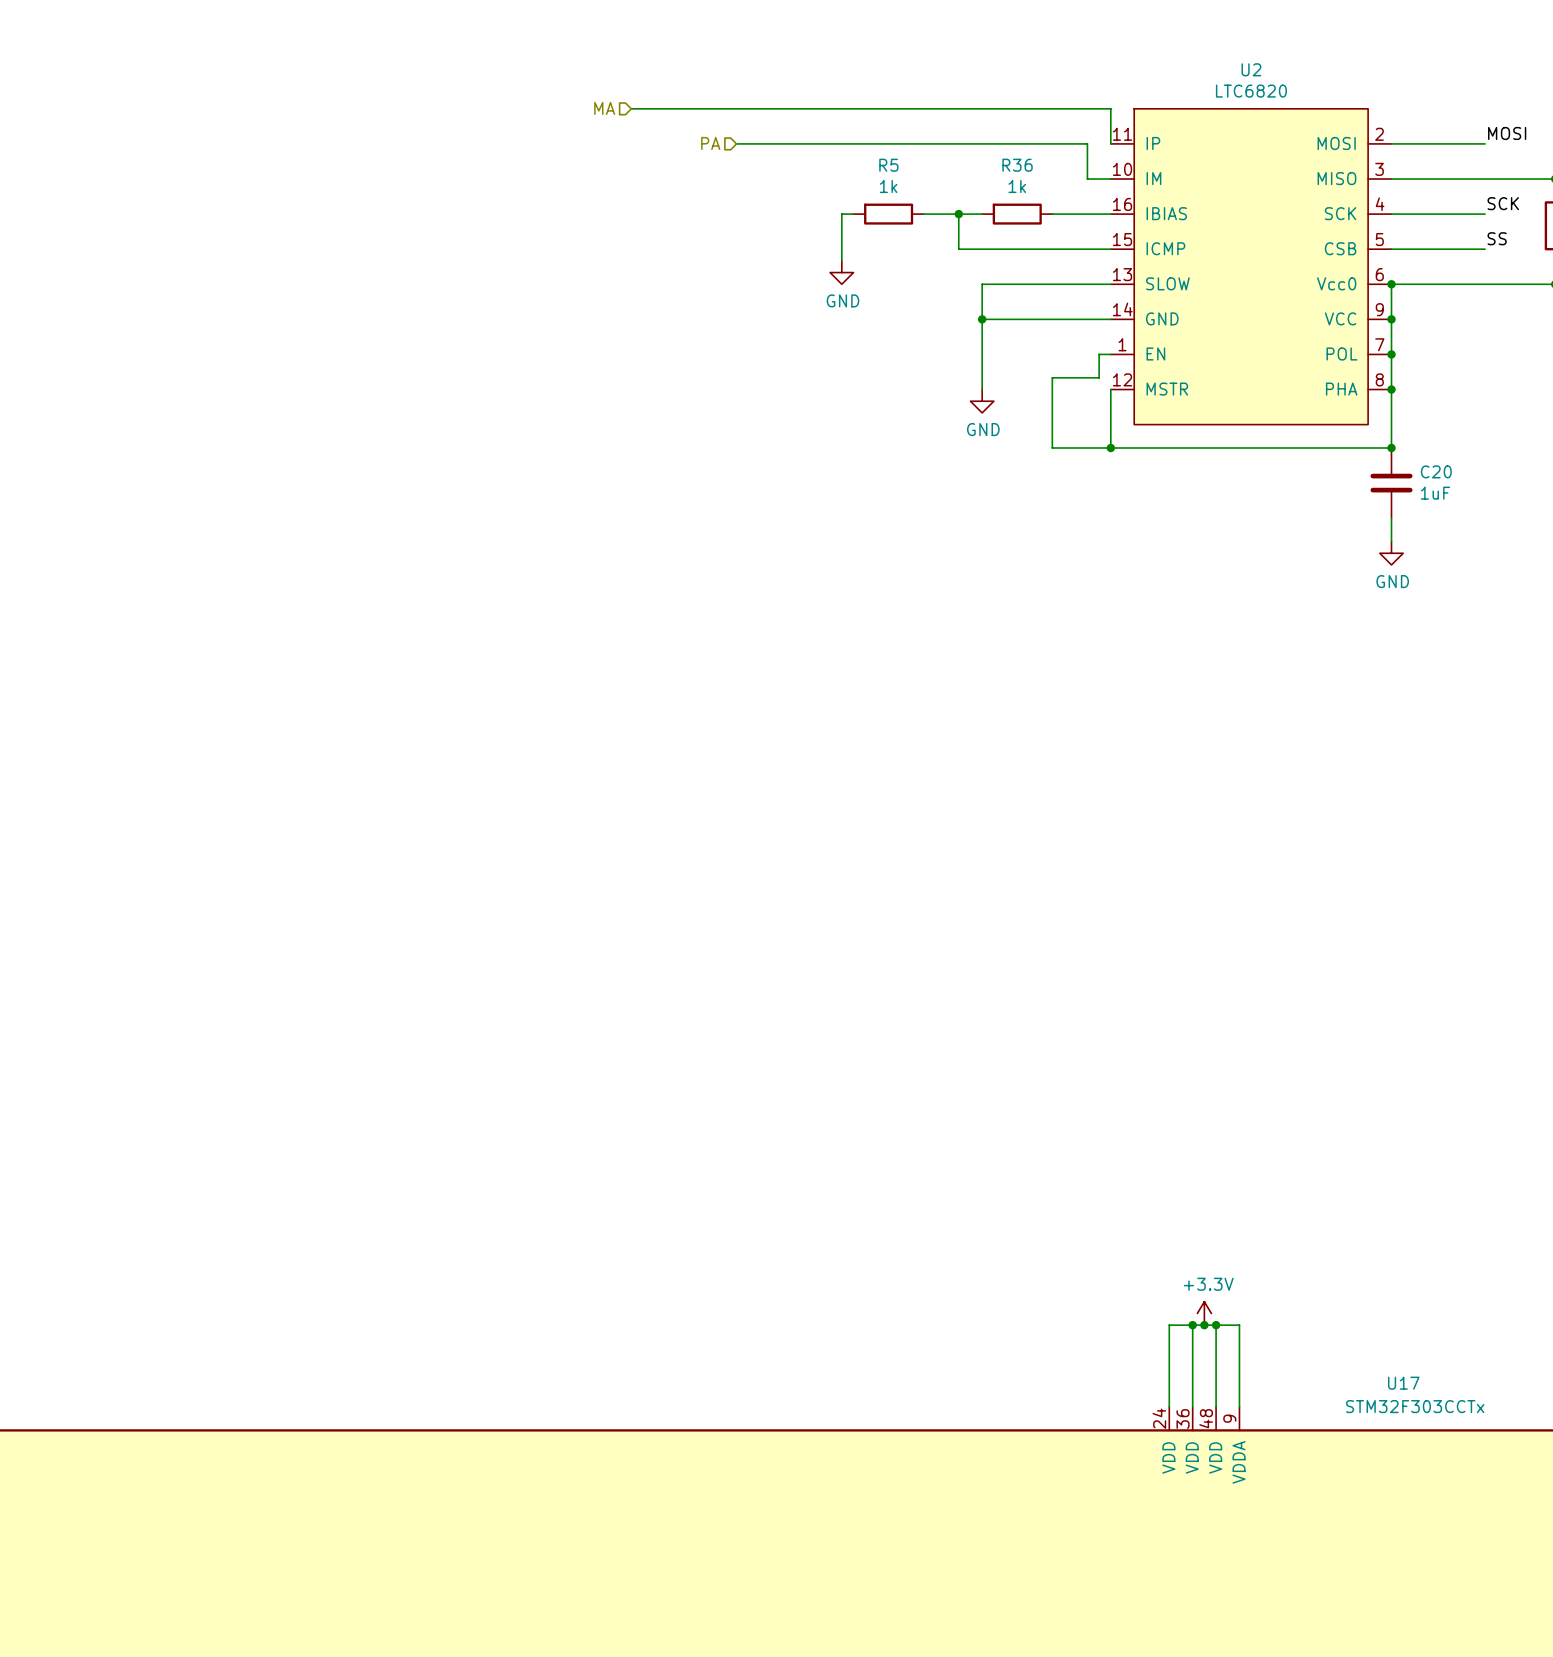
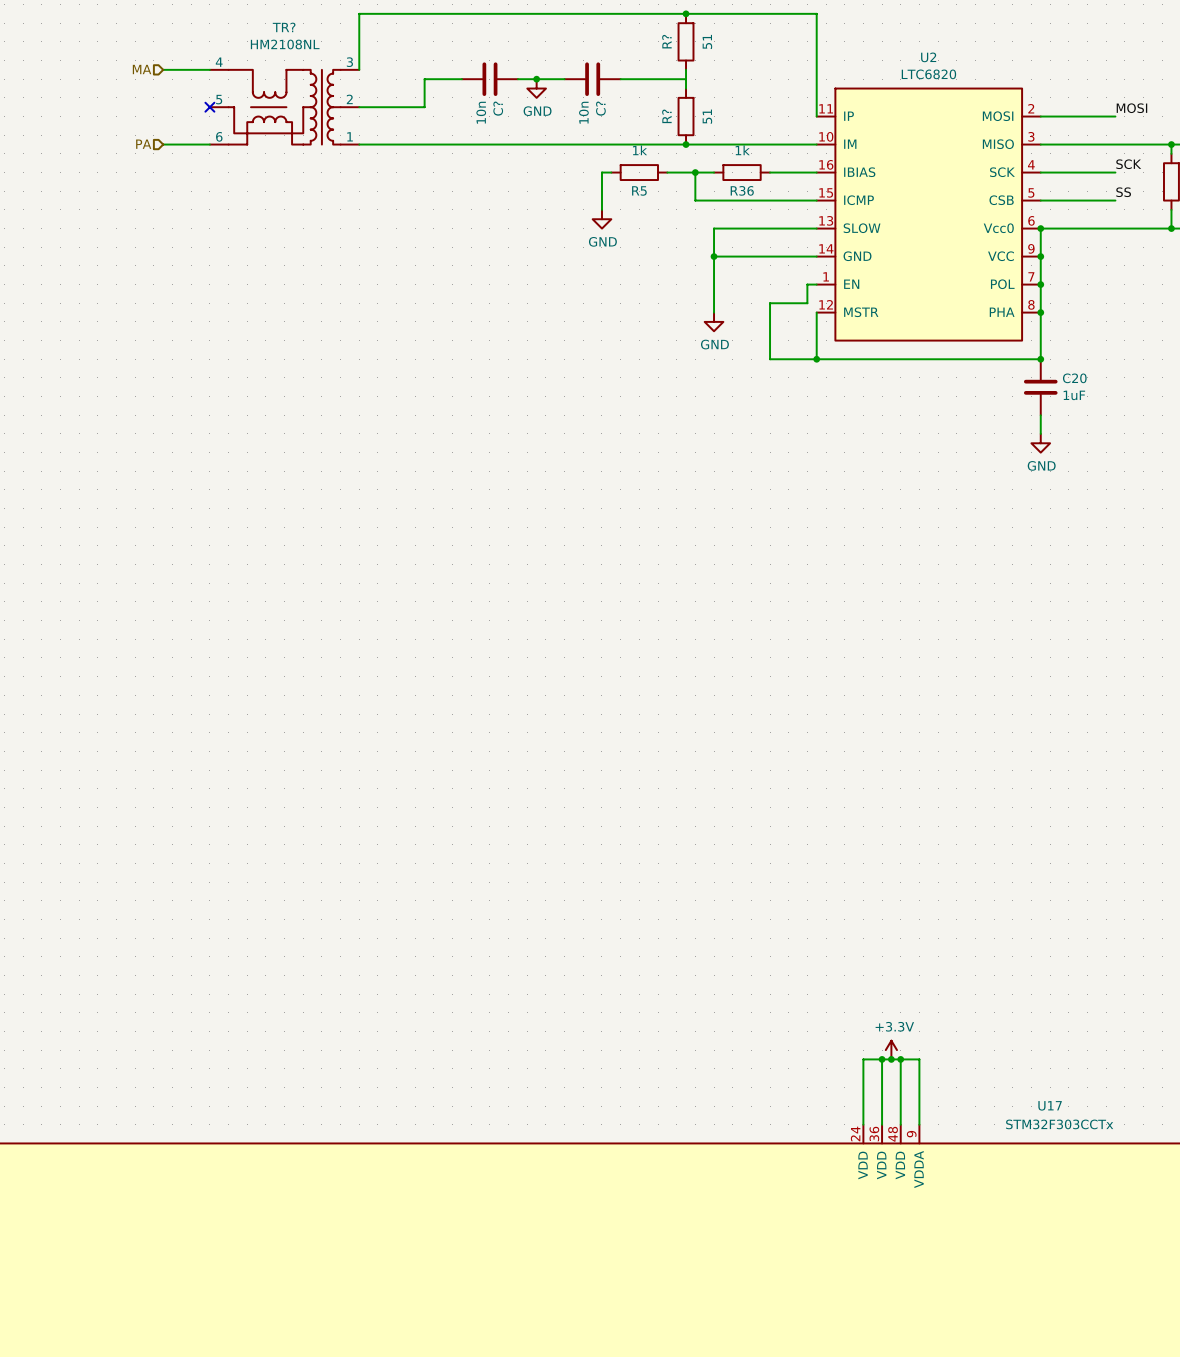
junction: none -> (686, 13)
R?: none -> 51 (686, 41)
hierarchical label: none -> MA (142, 69)
wire: none -> (163, 69) (209, 69)
wire: none -> (686, 69) (686, 88)
wire: none -> (461, 79) (424, 79) (424, 107) (359, 107)
C?: none -> 10n (489, 79)
wire: none -> (517, 79) (564, 79)
junction: none -> (536, 79)
C?: none -> 10n (592, 79)
wire: none -> (620, 79) (686, 79)
hierarchical label: MA (604, 108) -> none
wire: (631, 108) (1110, 108) -> (359, 69) (359, 13) (816, 13) (816, 88)
power symbol: none -> GND (536, 88)
no-connect mark: none -> (209, 107)
TR?: none -> HM2108NL (284, 107)
hierarchical label: PA (710, 143) -> none
wire: (736, 143) (1087, 143) (1087, 179) -> (359, 144) (798, 144)
R?: none -> 51 (686, 116)
R5 name position: R5 (888, 165) -> R5 (639, 190)
R36 name position: R36 (1017, 165) -> R36 (742, 190)
hierarchical label: none -> PA (143, 144)
wire: none -> (163, 144) (209, 144)
junction: none -> (686, 144)

